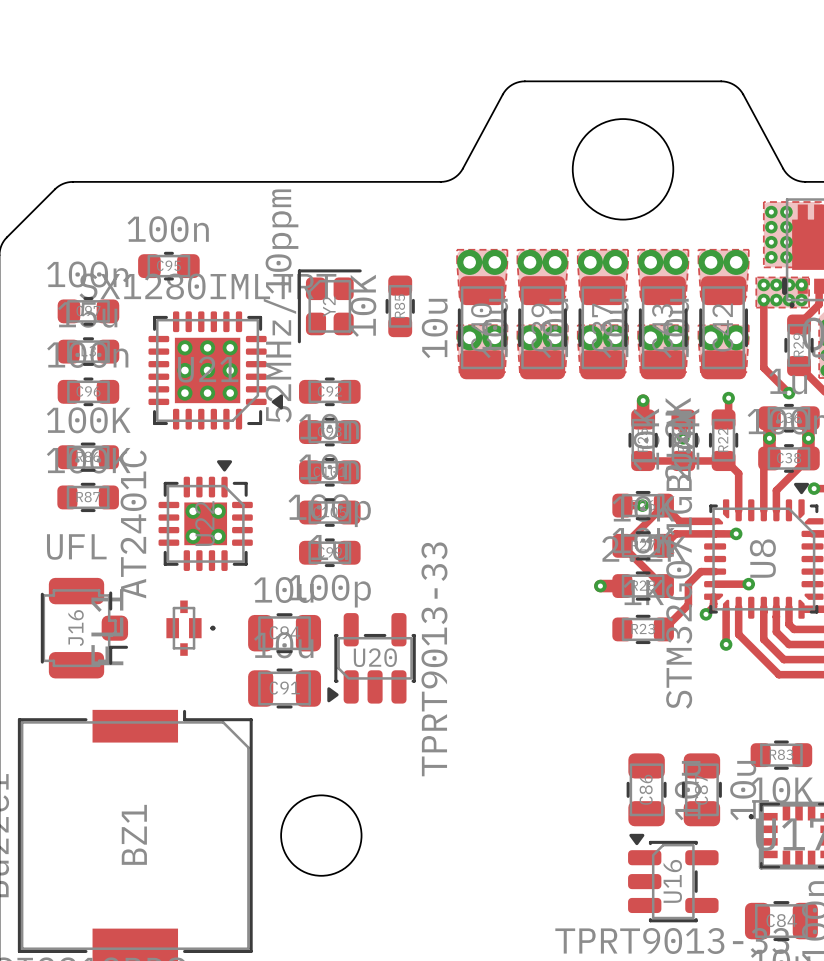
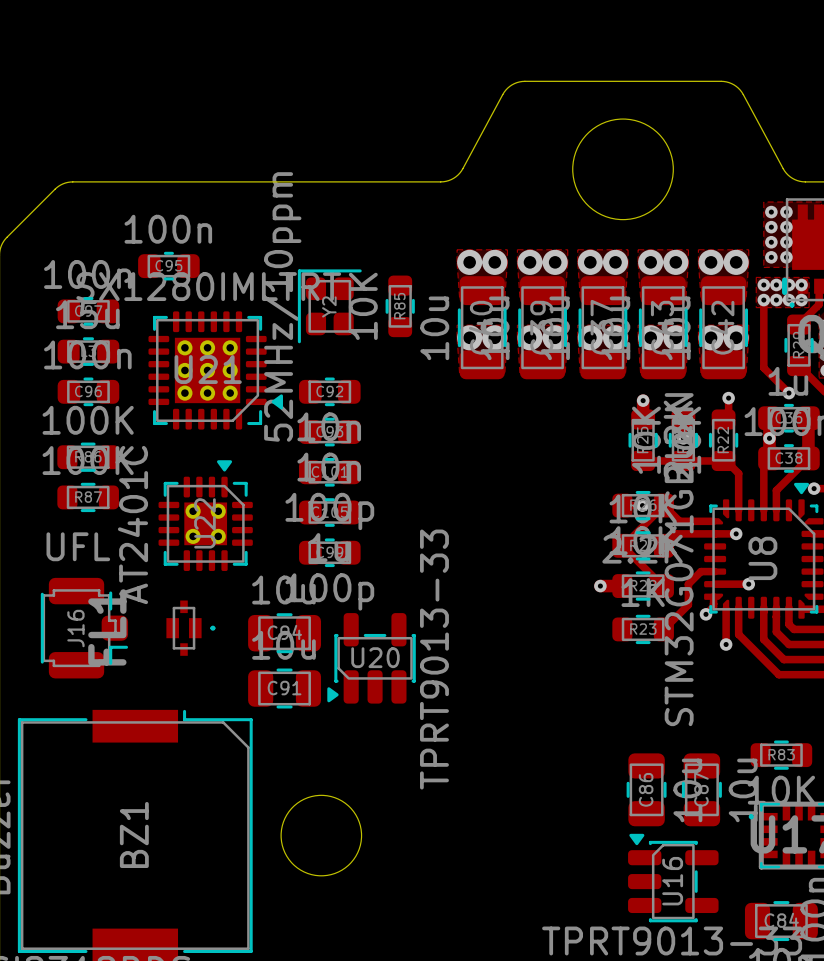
via: (808, 438) -> none

